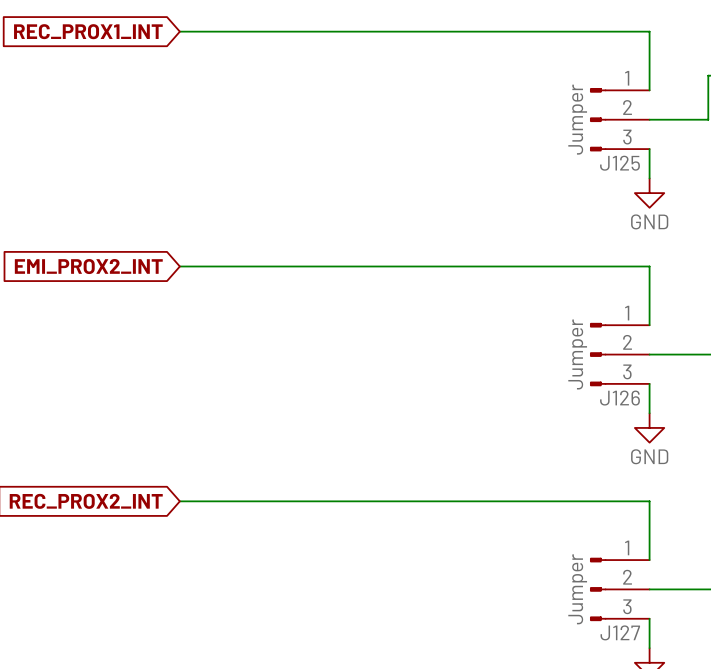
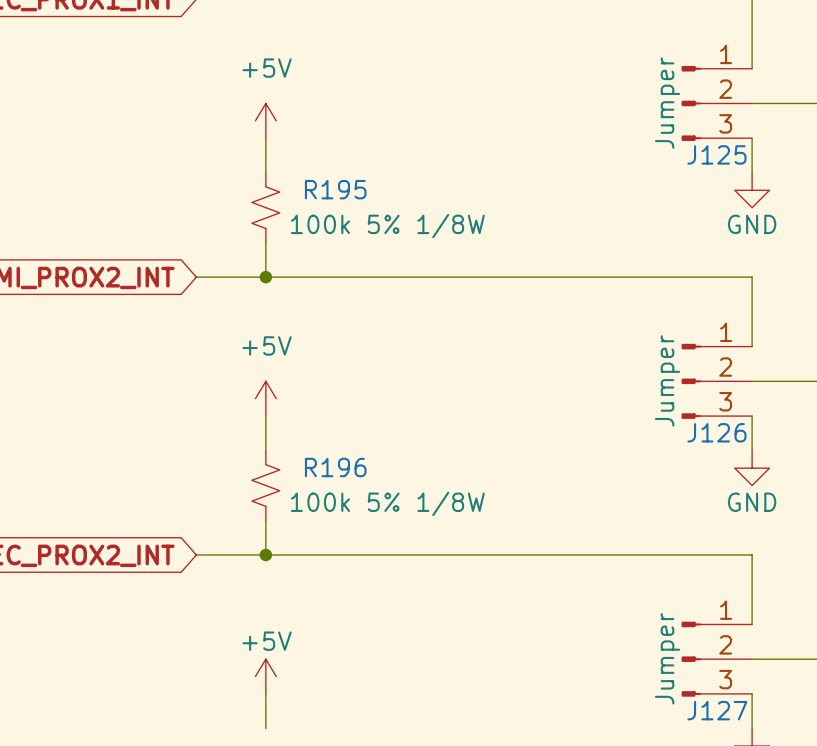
power symbol: none -> +5V (265, 120)
wire: none -> (265, 138) (265, 172)
R195: none -> 100k 5% 1/8W (265, 207)
wire: none -> (265, 242) (265, 277)
junction: none -> (265, 277)
power symbol: none -> +5V (265, 398)
wire: none -> (265, 416) (265, 450)
R196: none -> 100k 5% 1/8W (265, 485)
wire: none -> (265, 520) (265, 555)
junction: none -> (265, 555)
power symbol: none -> +5V (265, 676)
wire: none -> (265, 693) (265, 728)

